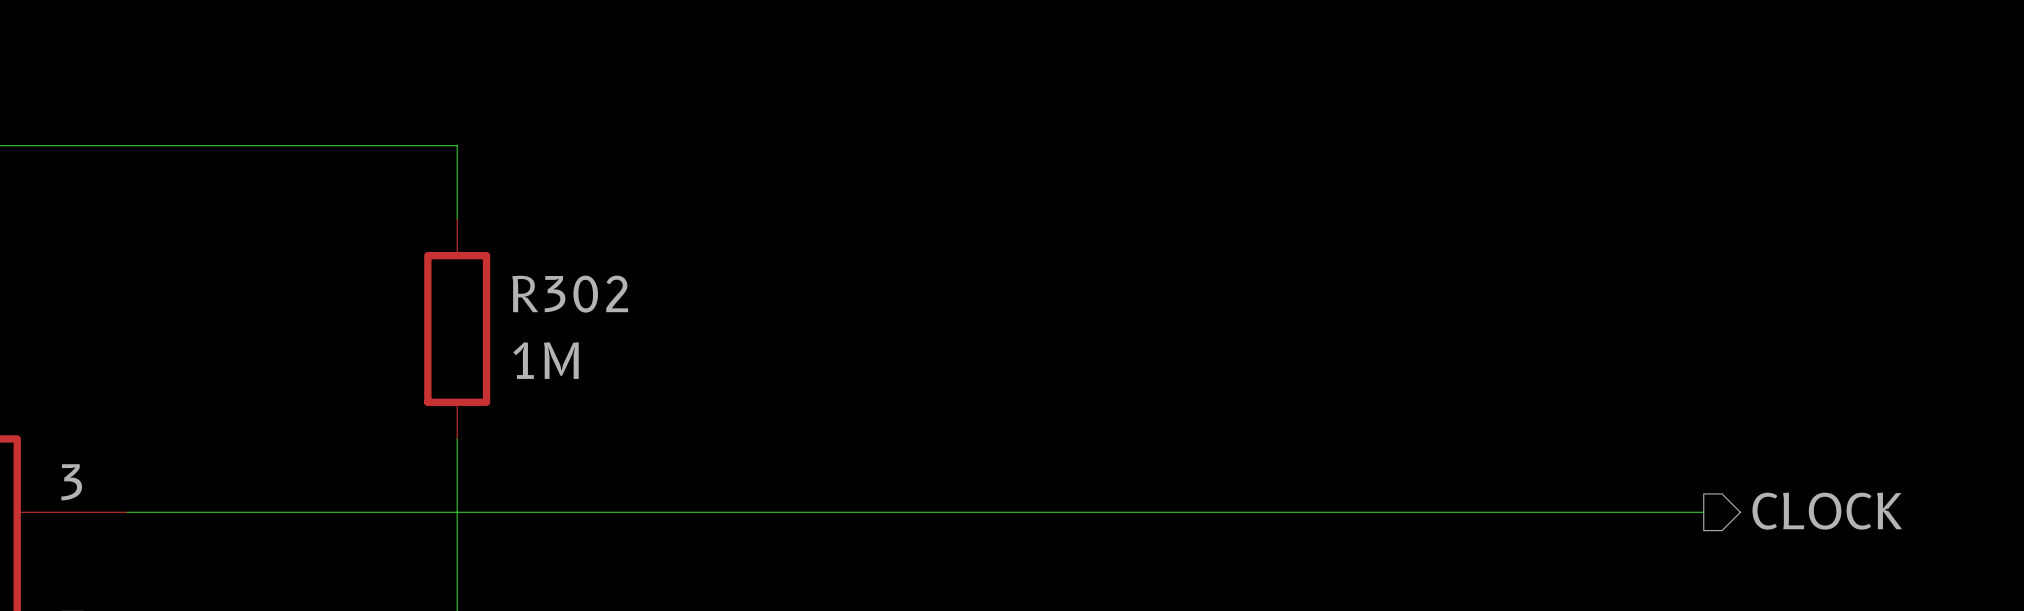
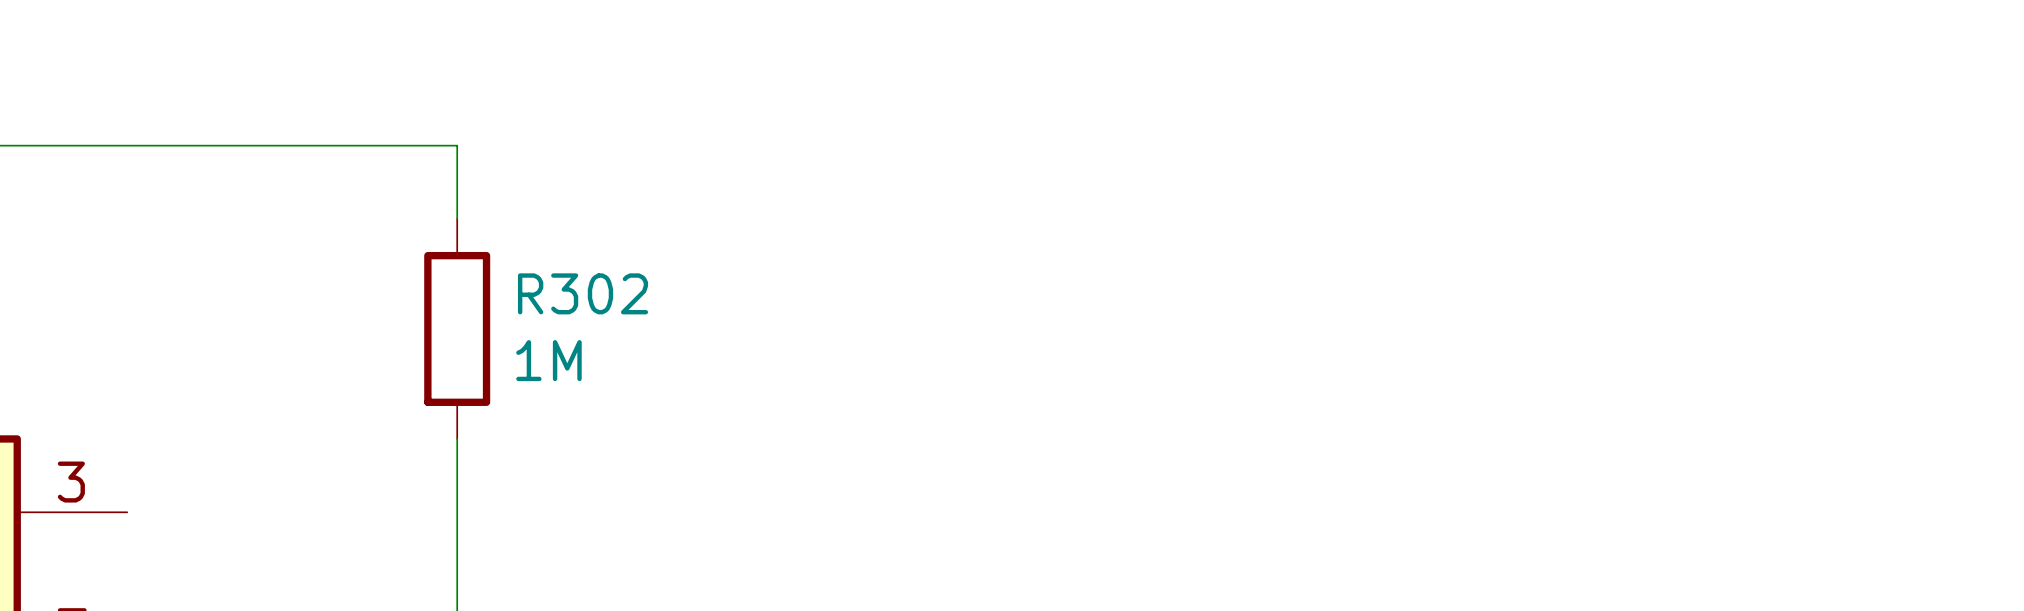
hierarchical label: CLOCK (1827, 511) -> none
wire: (127, 512) (1703, 512) -> none

